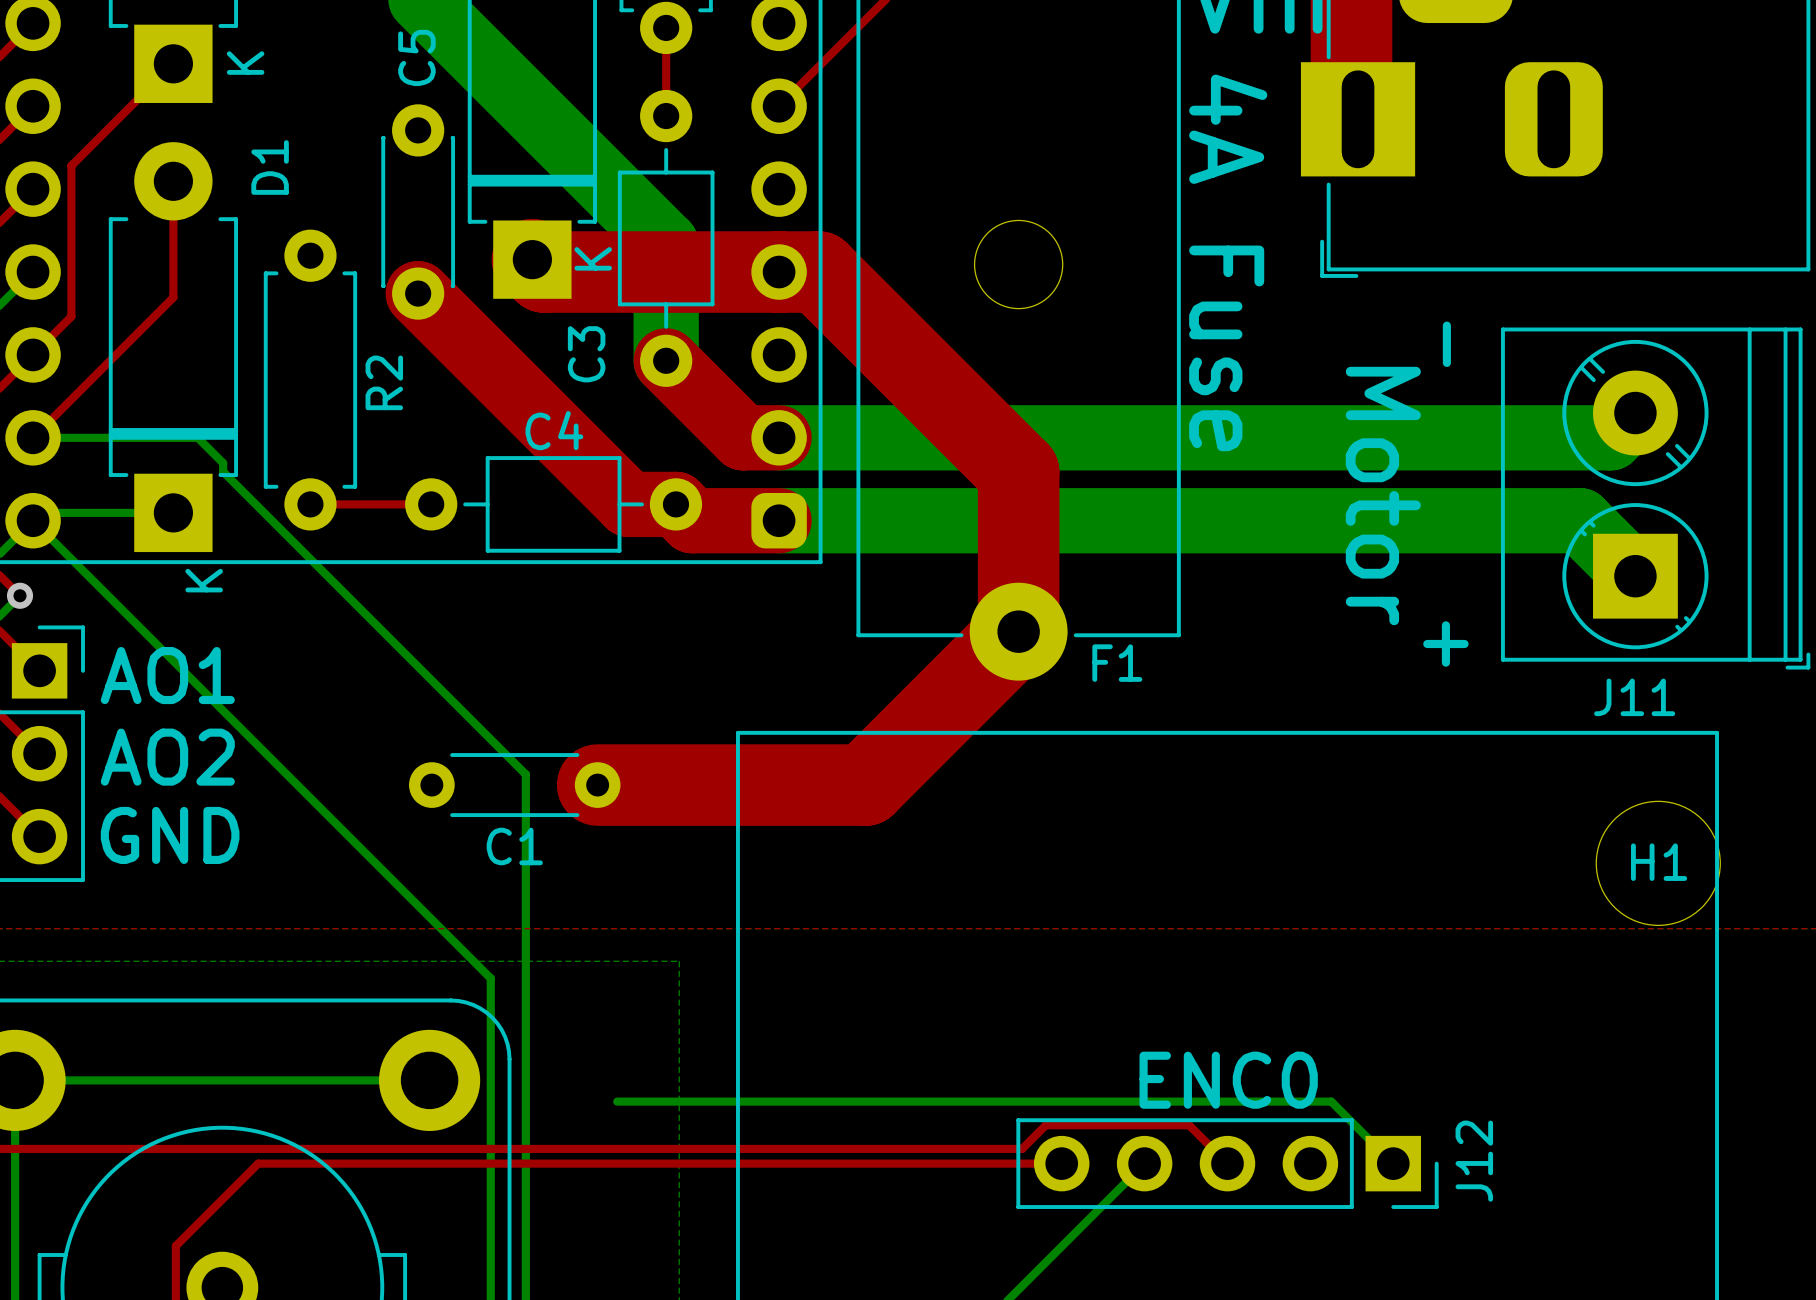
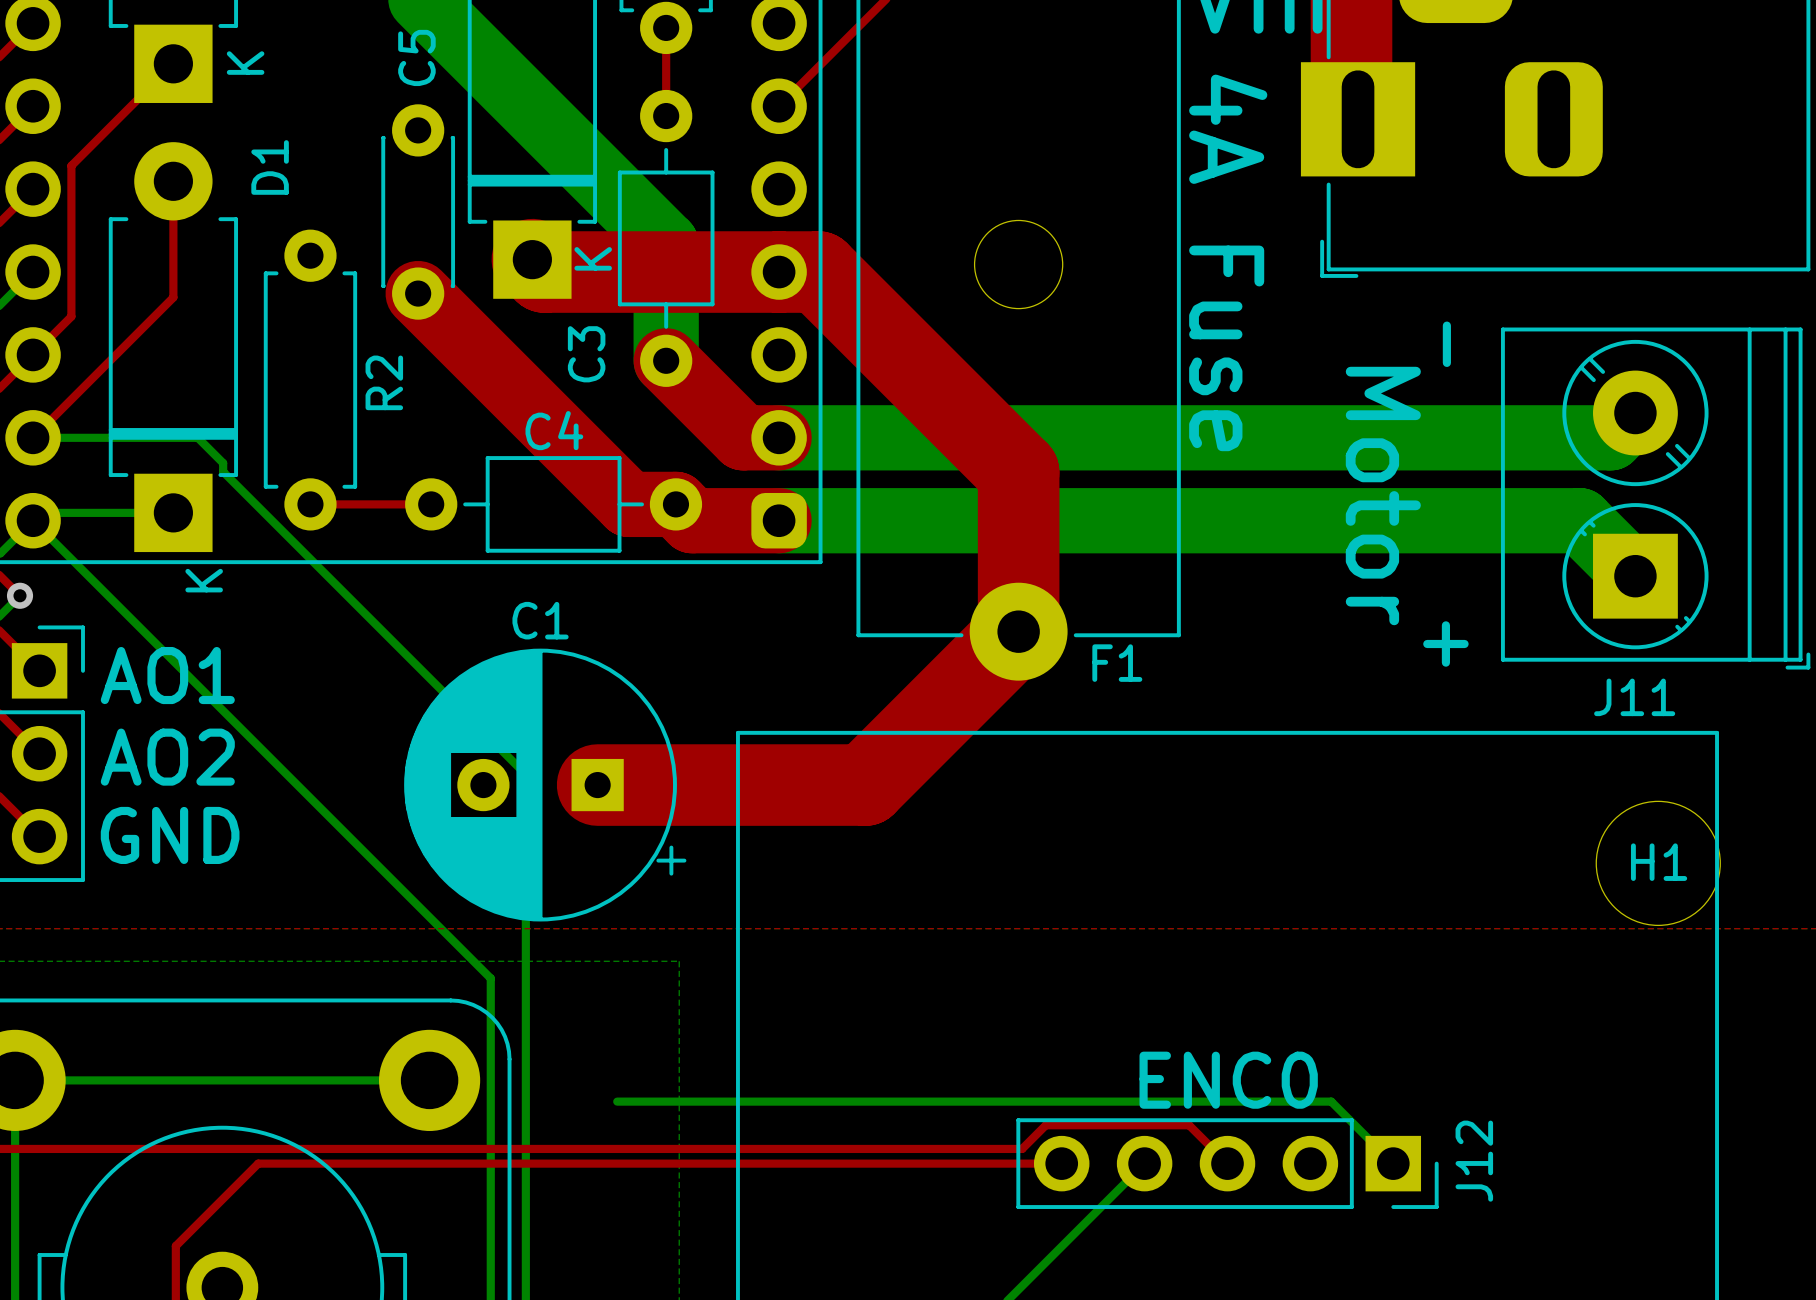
C1 footprint: [409, 753, 621, 818] -> [404, 648, 687, 922]
C1 name position: C1 (514, 846) -> C1 (540, 620)

